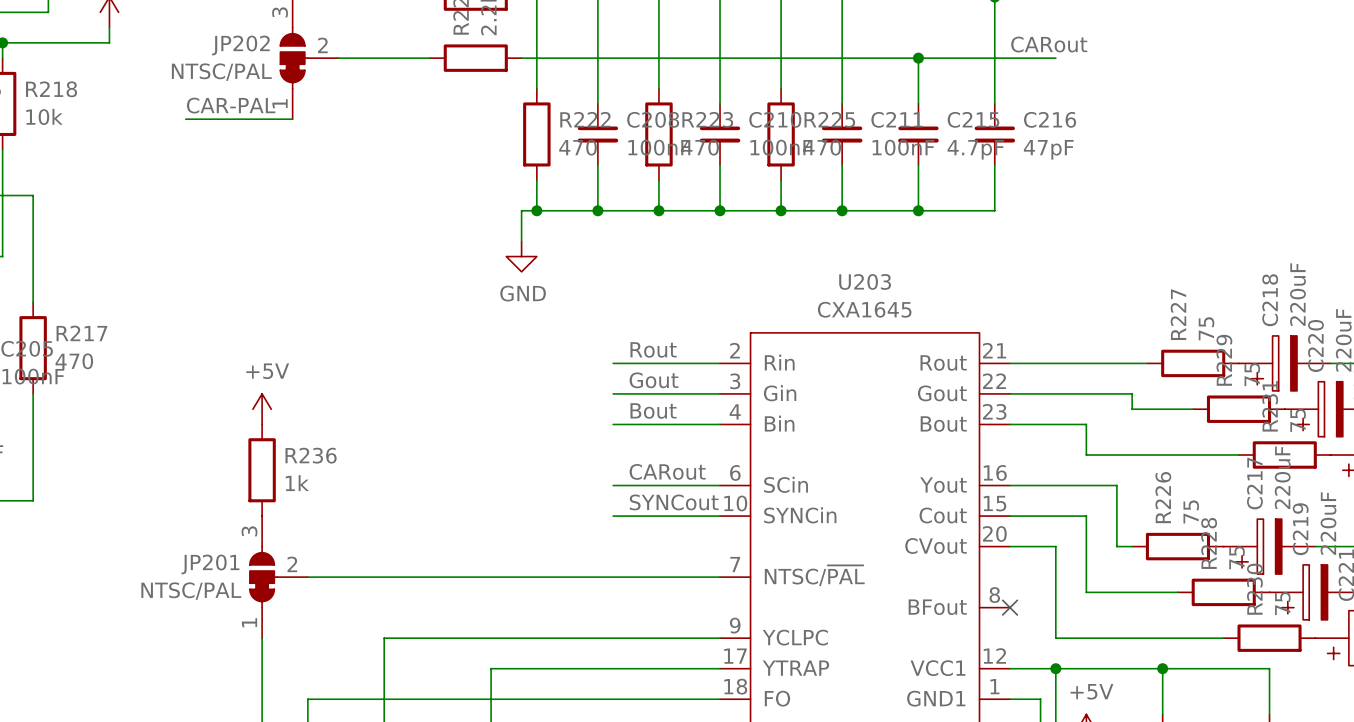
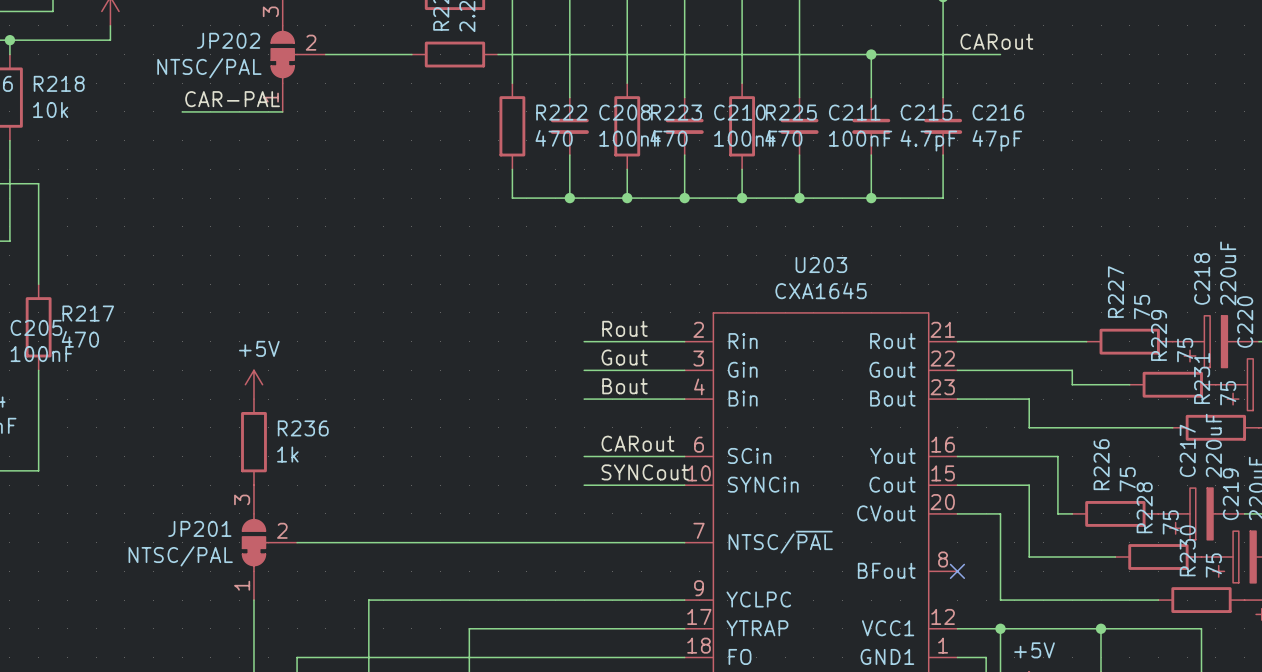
wire: (536, 210) (521, 210) (521, 241) -> none
junction: (536, 210) -> none
power symbol: GND (521, 256) -> none

